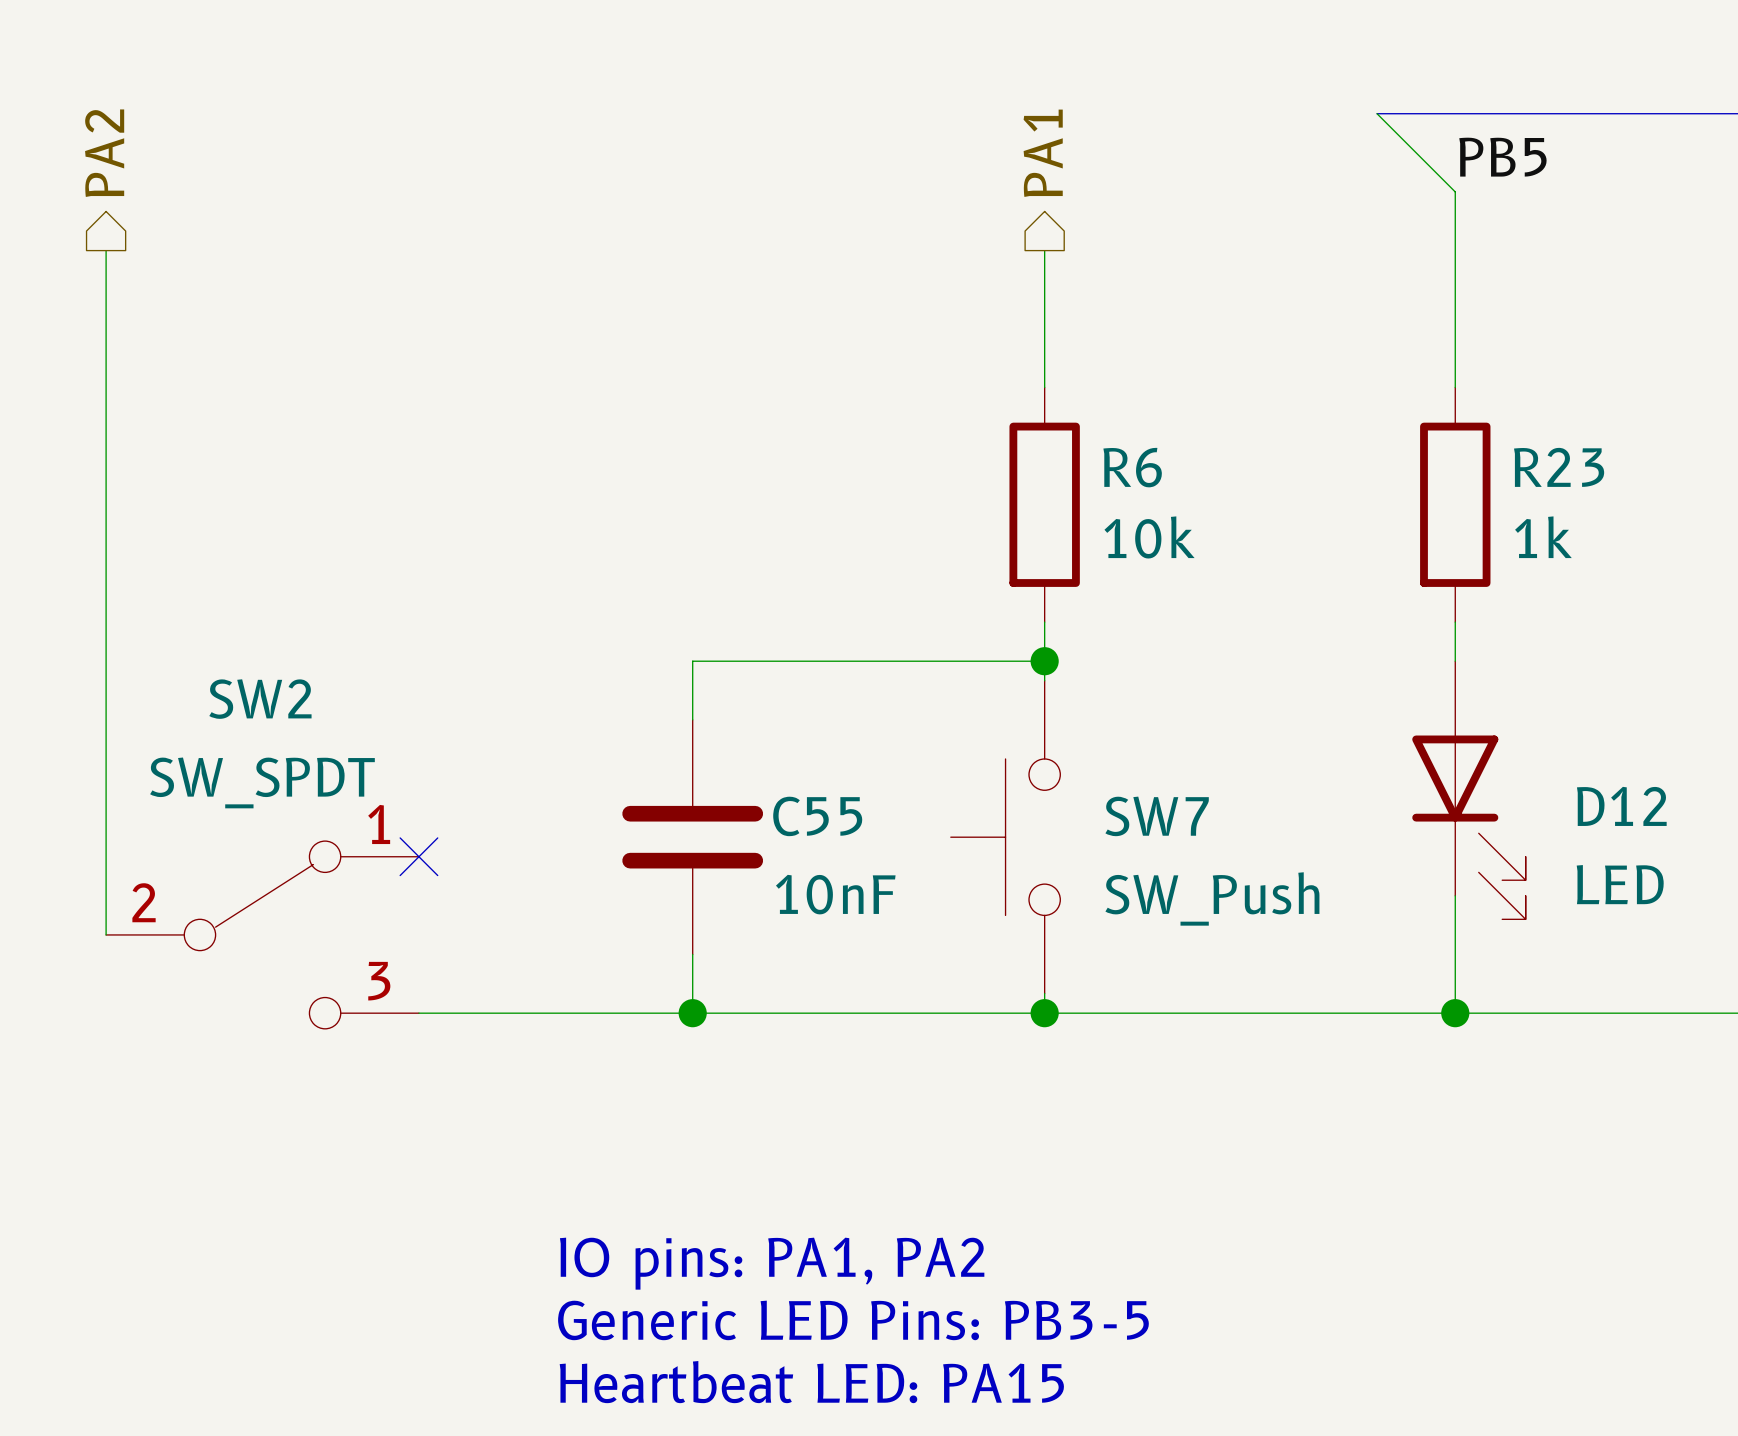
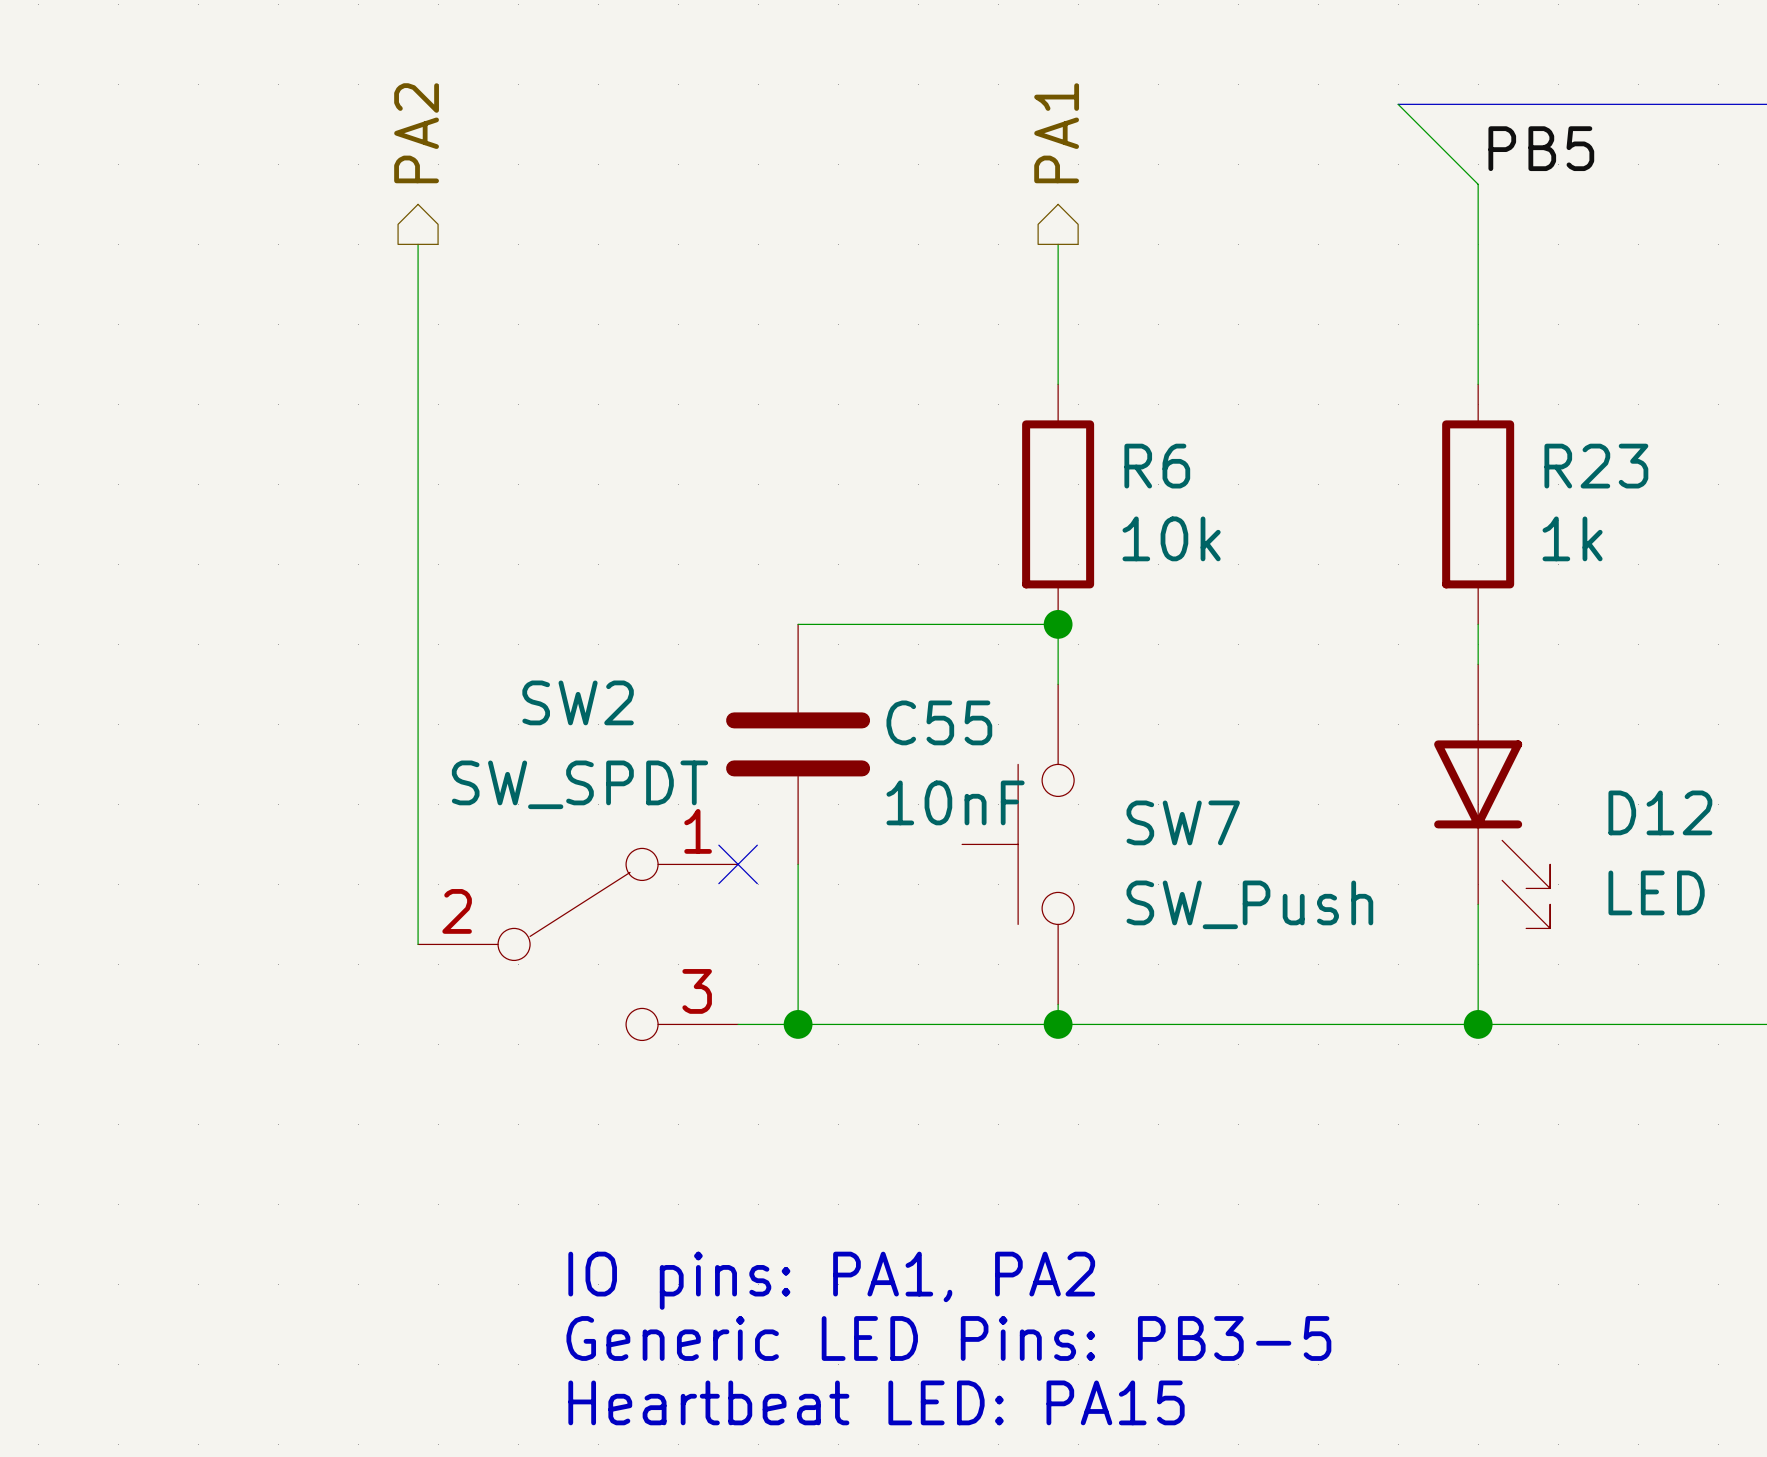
hierarchical label position: PA2 (104, 153) -> PA2 (416, 133)
wire: (106, 250) (106, 934) -> (418, 244) (418, 944)
wire: none -> (798, 624) (1058, 624)
wire: (1044, 661) (692, 661) (692, 719) -> none
junction position: (1044, 661) -> (1058, 624)
C55 position: (692, 837) -> (798, 744)
no-connect mark: (418, 856) -> none
no-connect mark: none -> (738, 864)
wire: none -> (798, 864) (798, 1024)
SW2 position: (262, 934) -> (578, 944)
wire: (692, 954) (692, 1013) -> none
wire: (418, 1013) (731, 1013) -> none
junction position: (692, 1013) -> (798, 1024)

